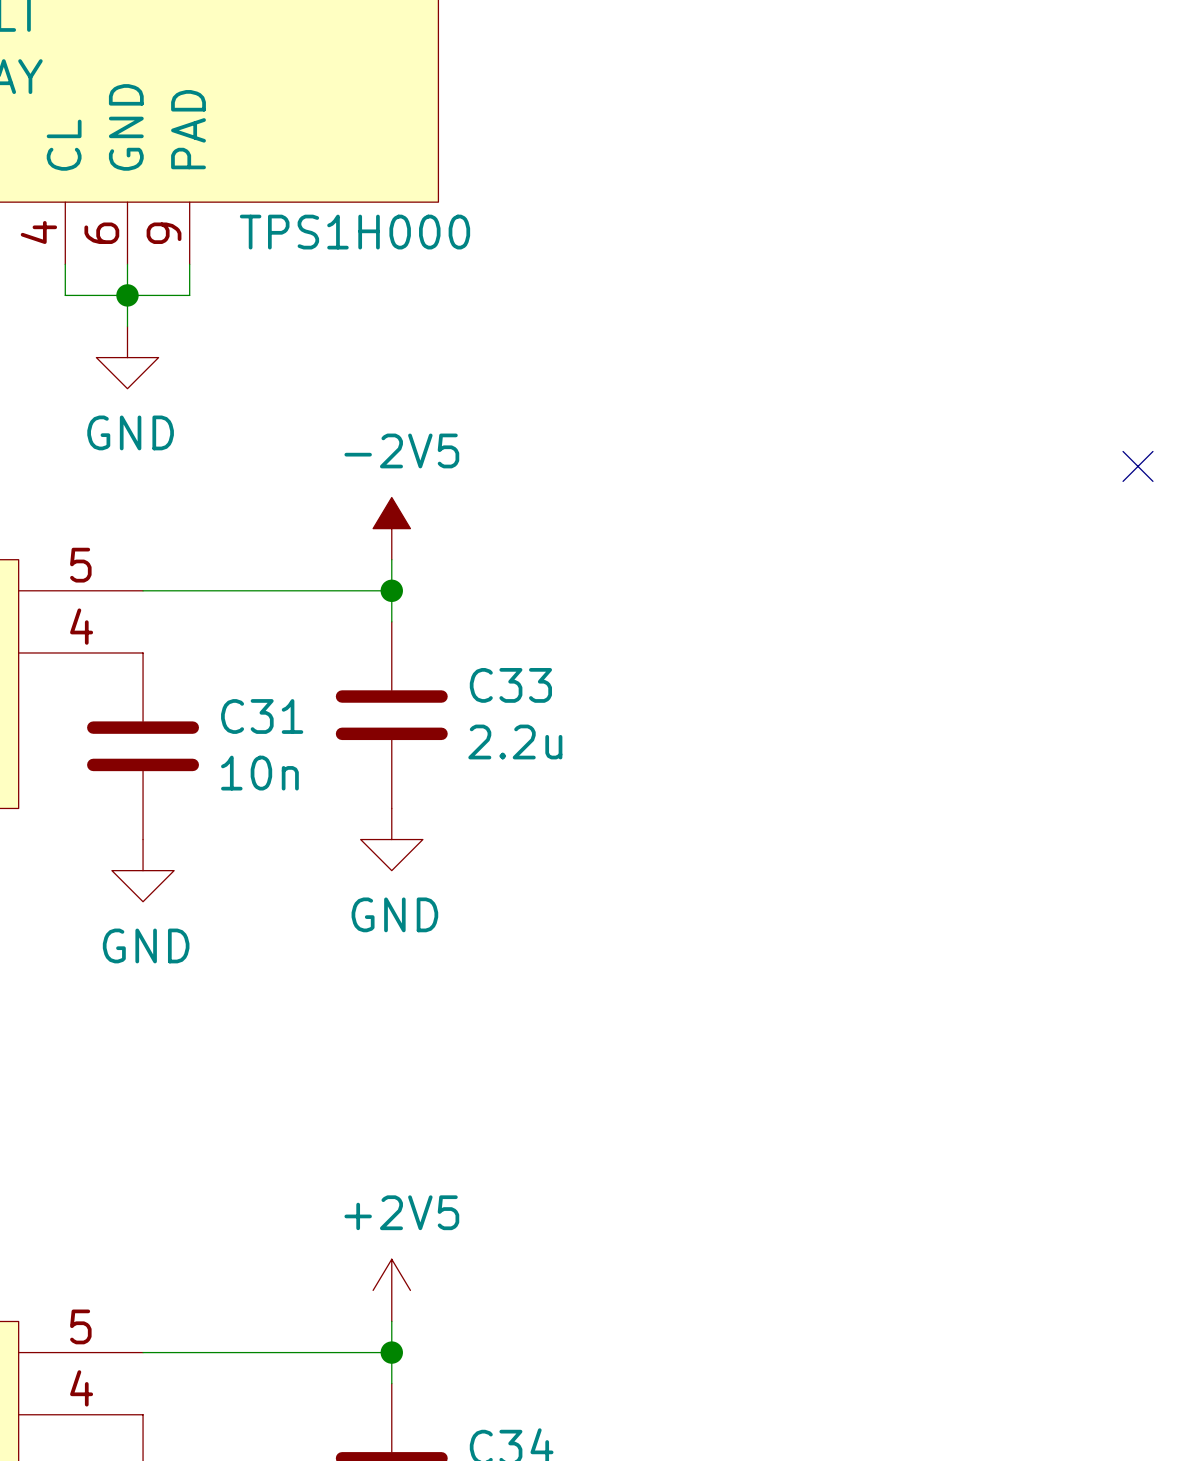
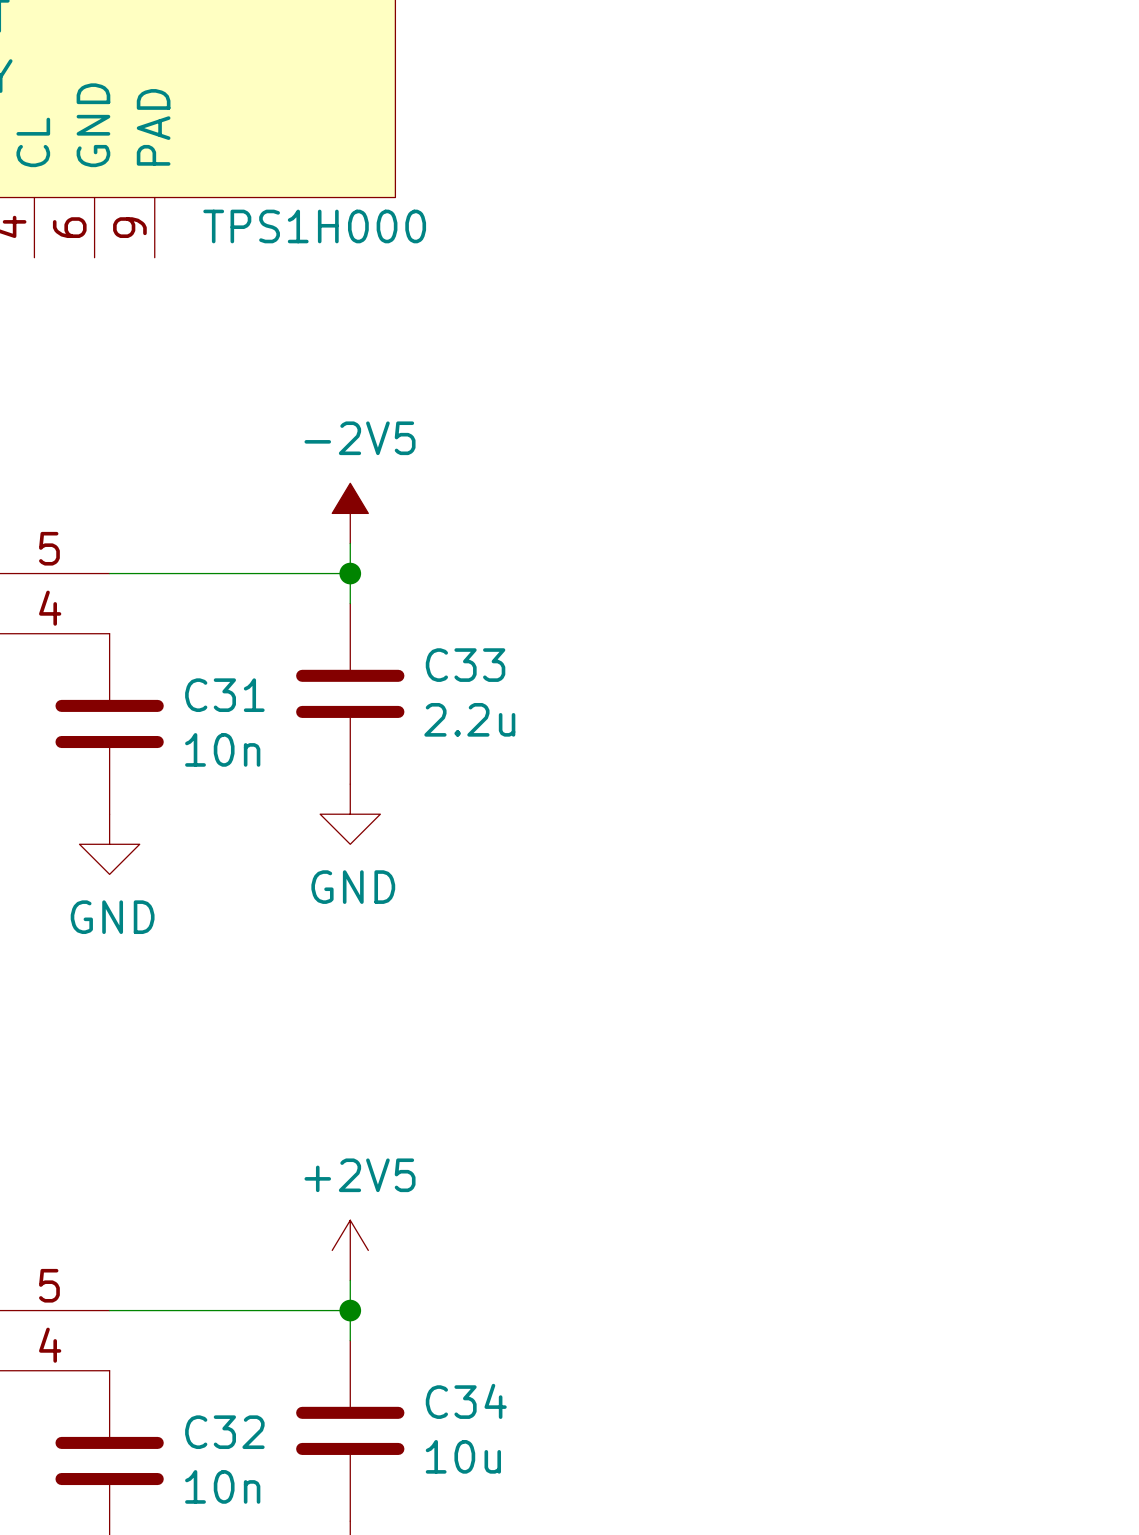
wire: (65, 264) (65, 295) (189, 295) (189, 264) -> none
wire: (127, 264) (127, 326) -> none
junction: (127, 295) -> none
power symbol: GND (127, 357) -> none
no-connect mark: (1138, 466) -> none

